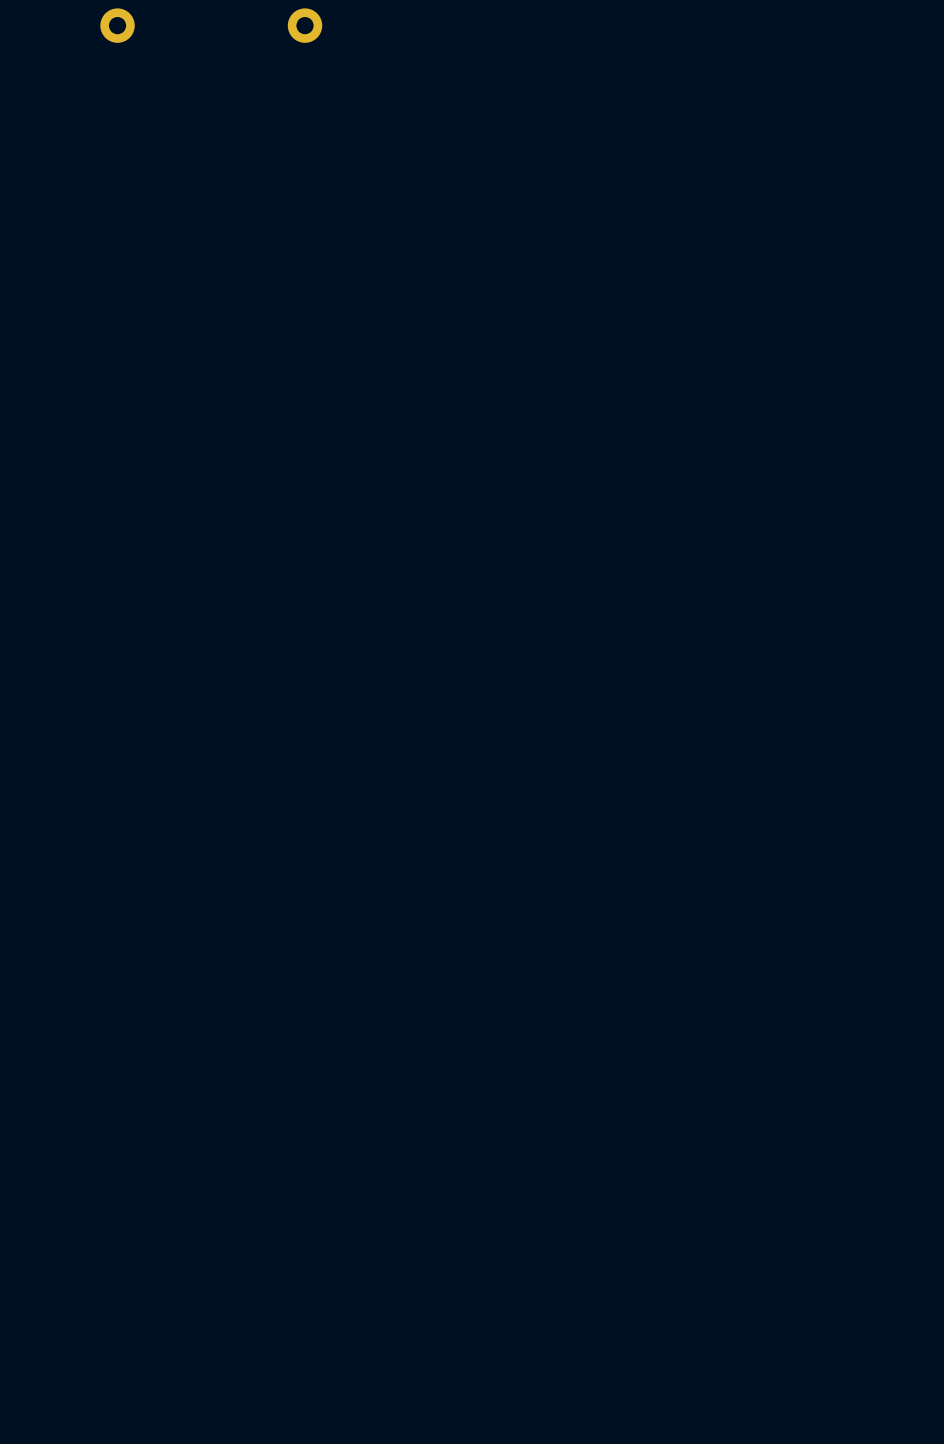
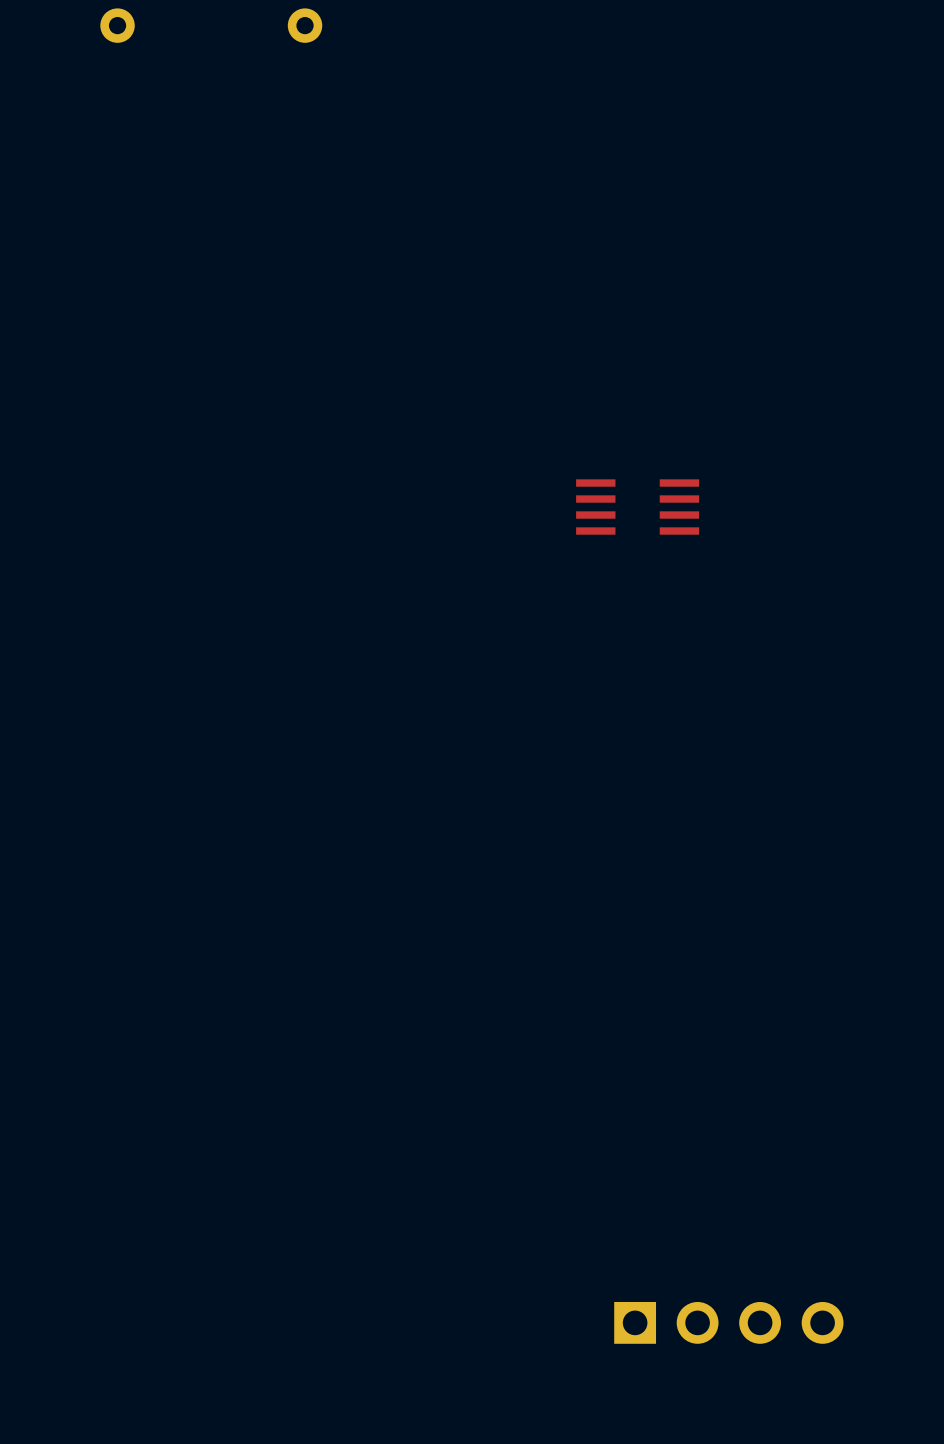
part: none -> (637, 507)
part: none -> (728, 1322)

